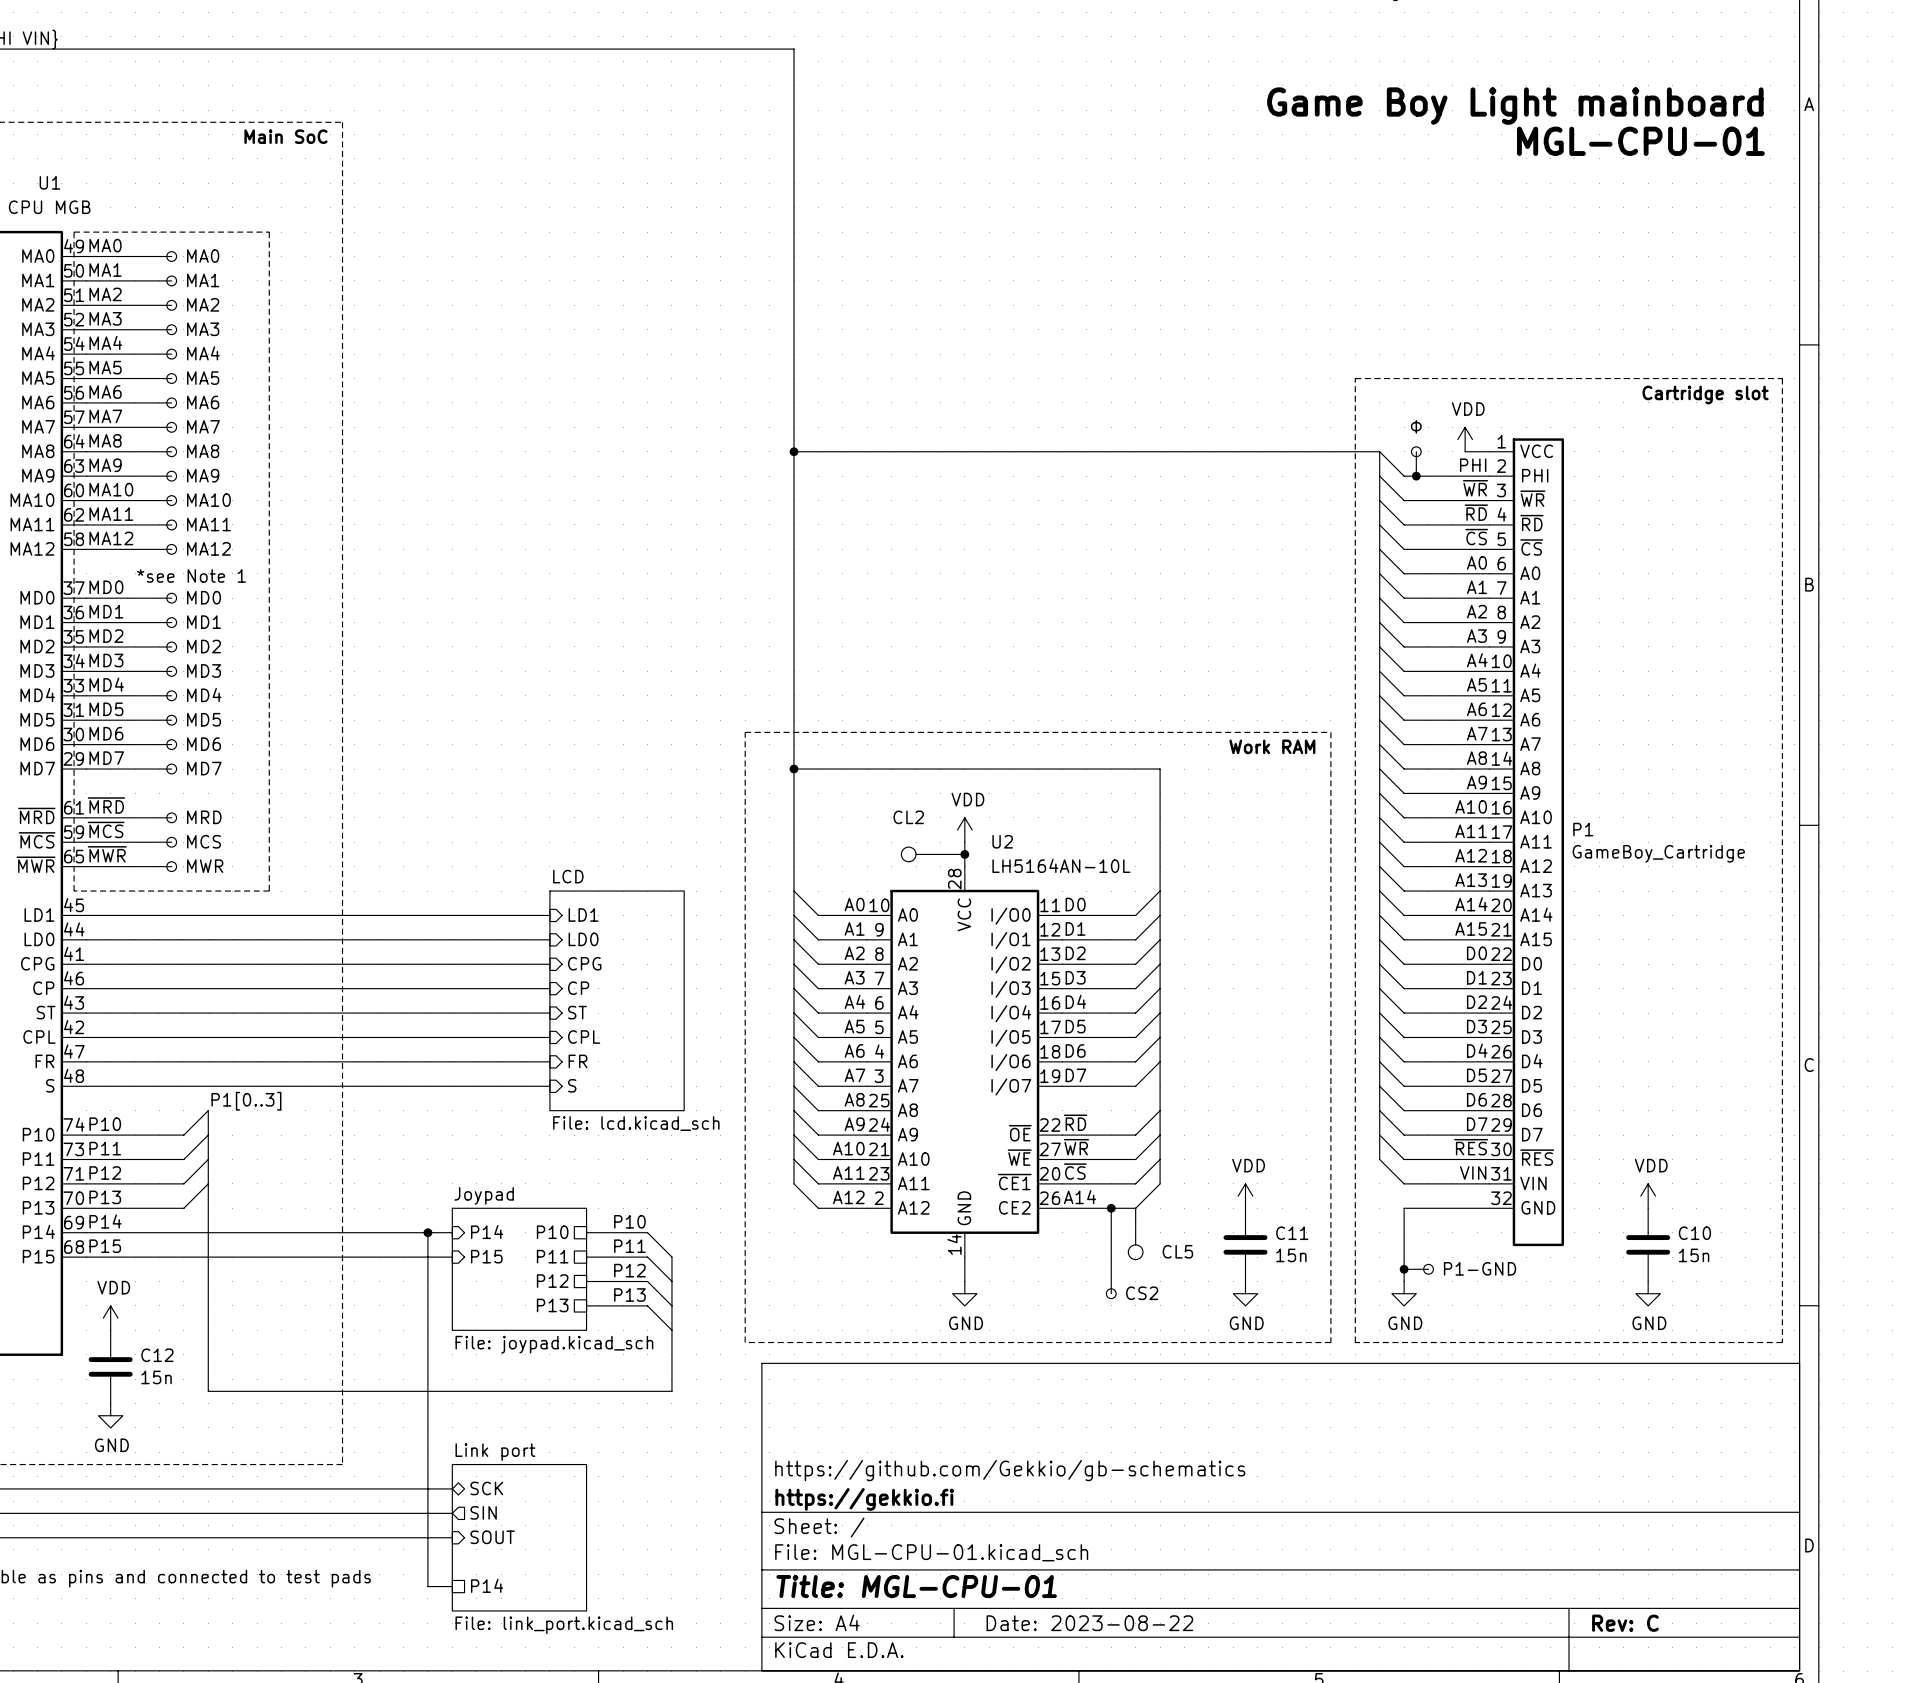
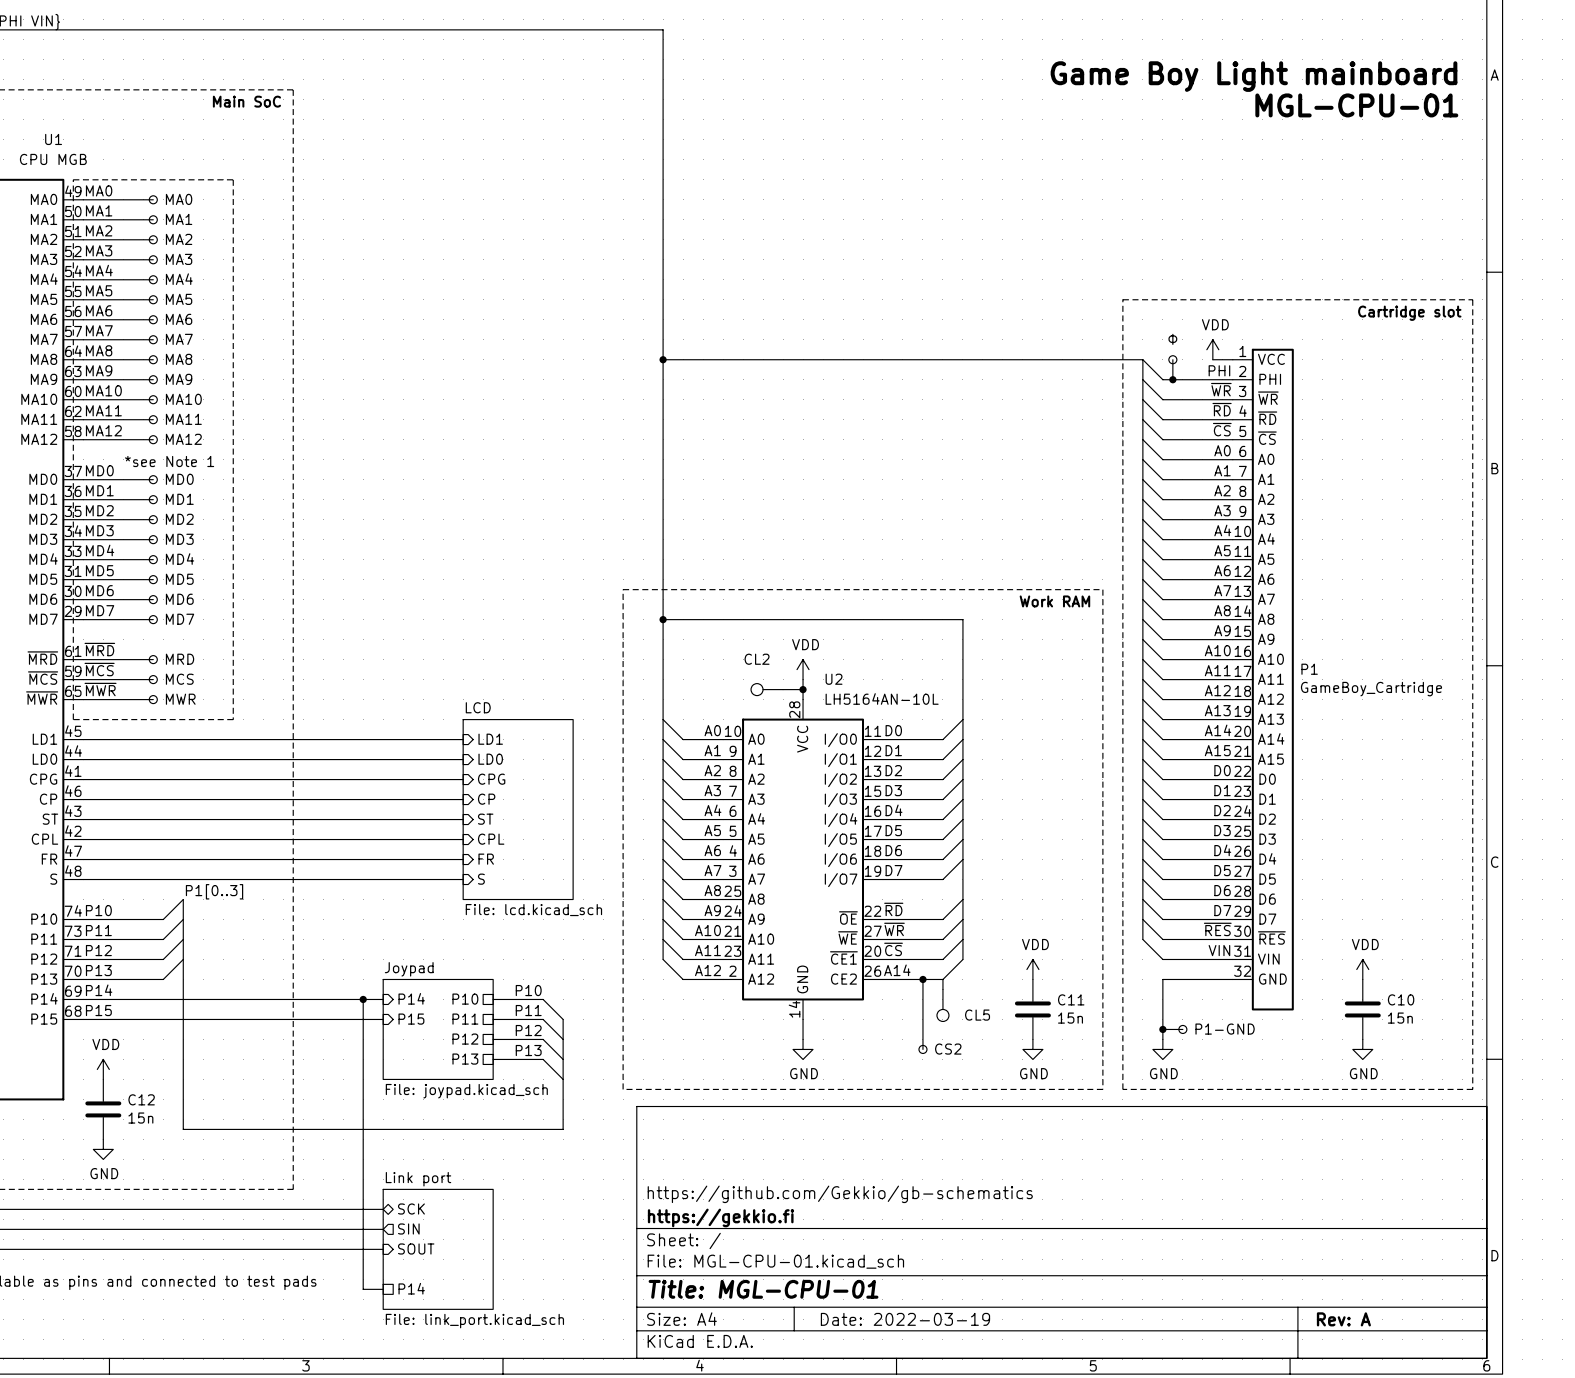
title block: Date: 2023-08-22 (1089, 1623) -> Date: 2022-03-19 (905, 1319)
title block: Rev: C (1625, 1623) -> Rev: A (1343, 1319)

